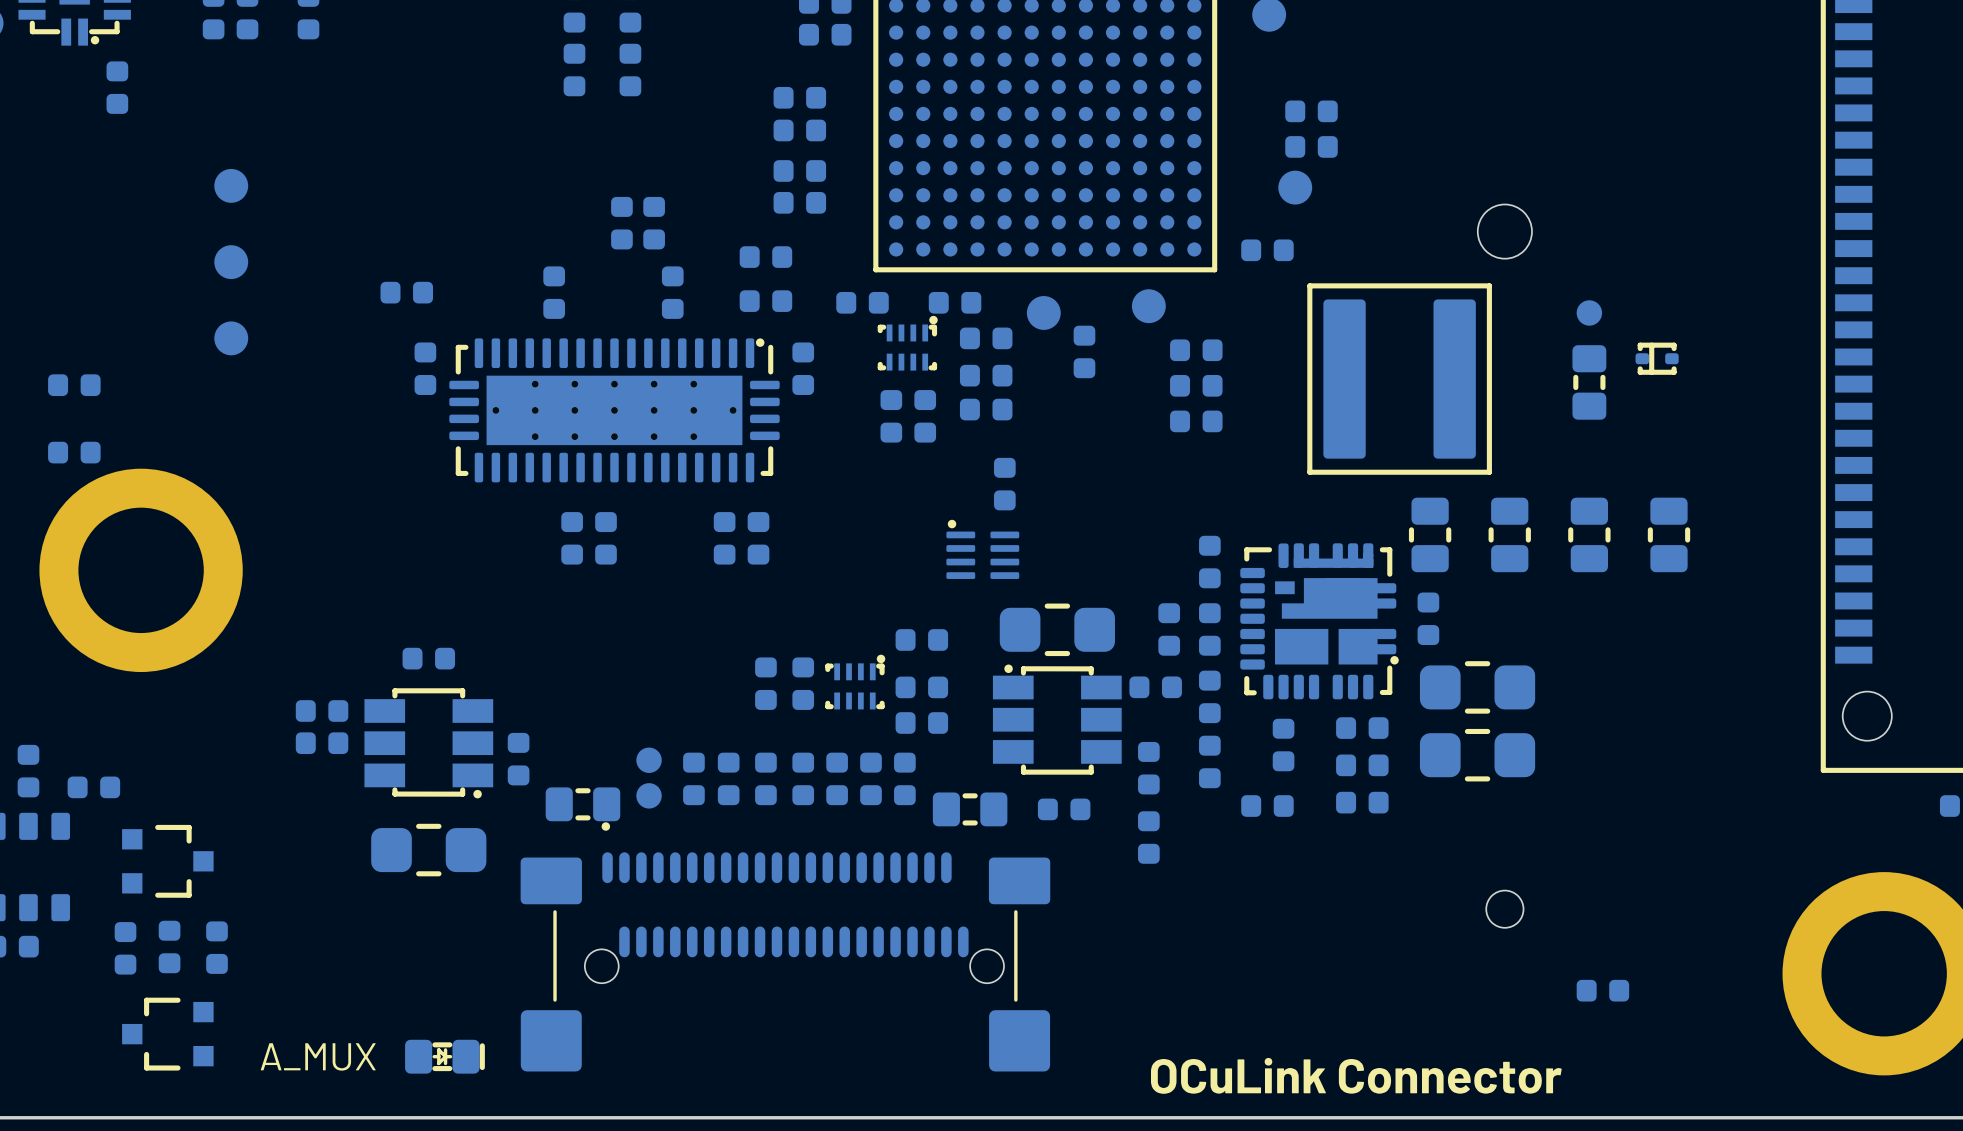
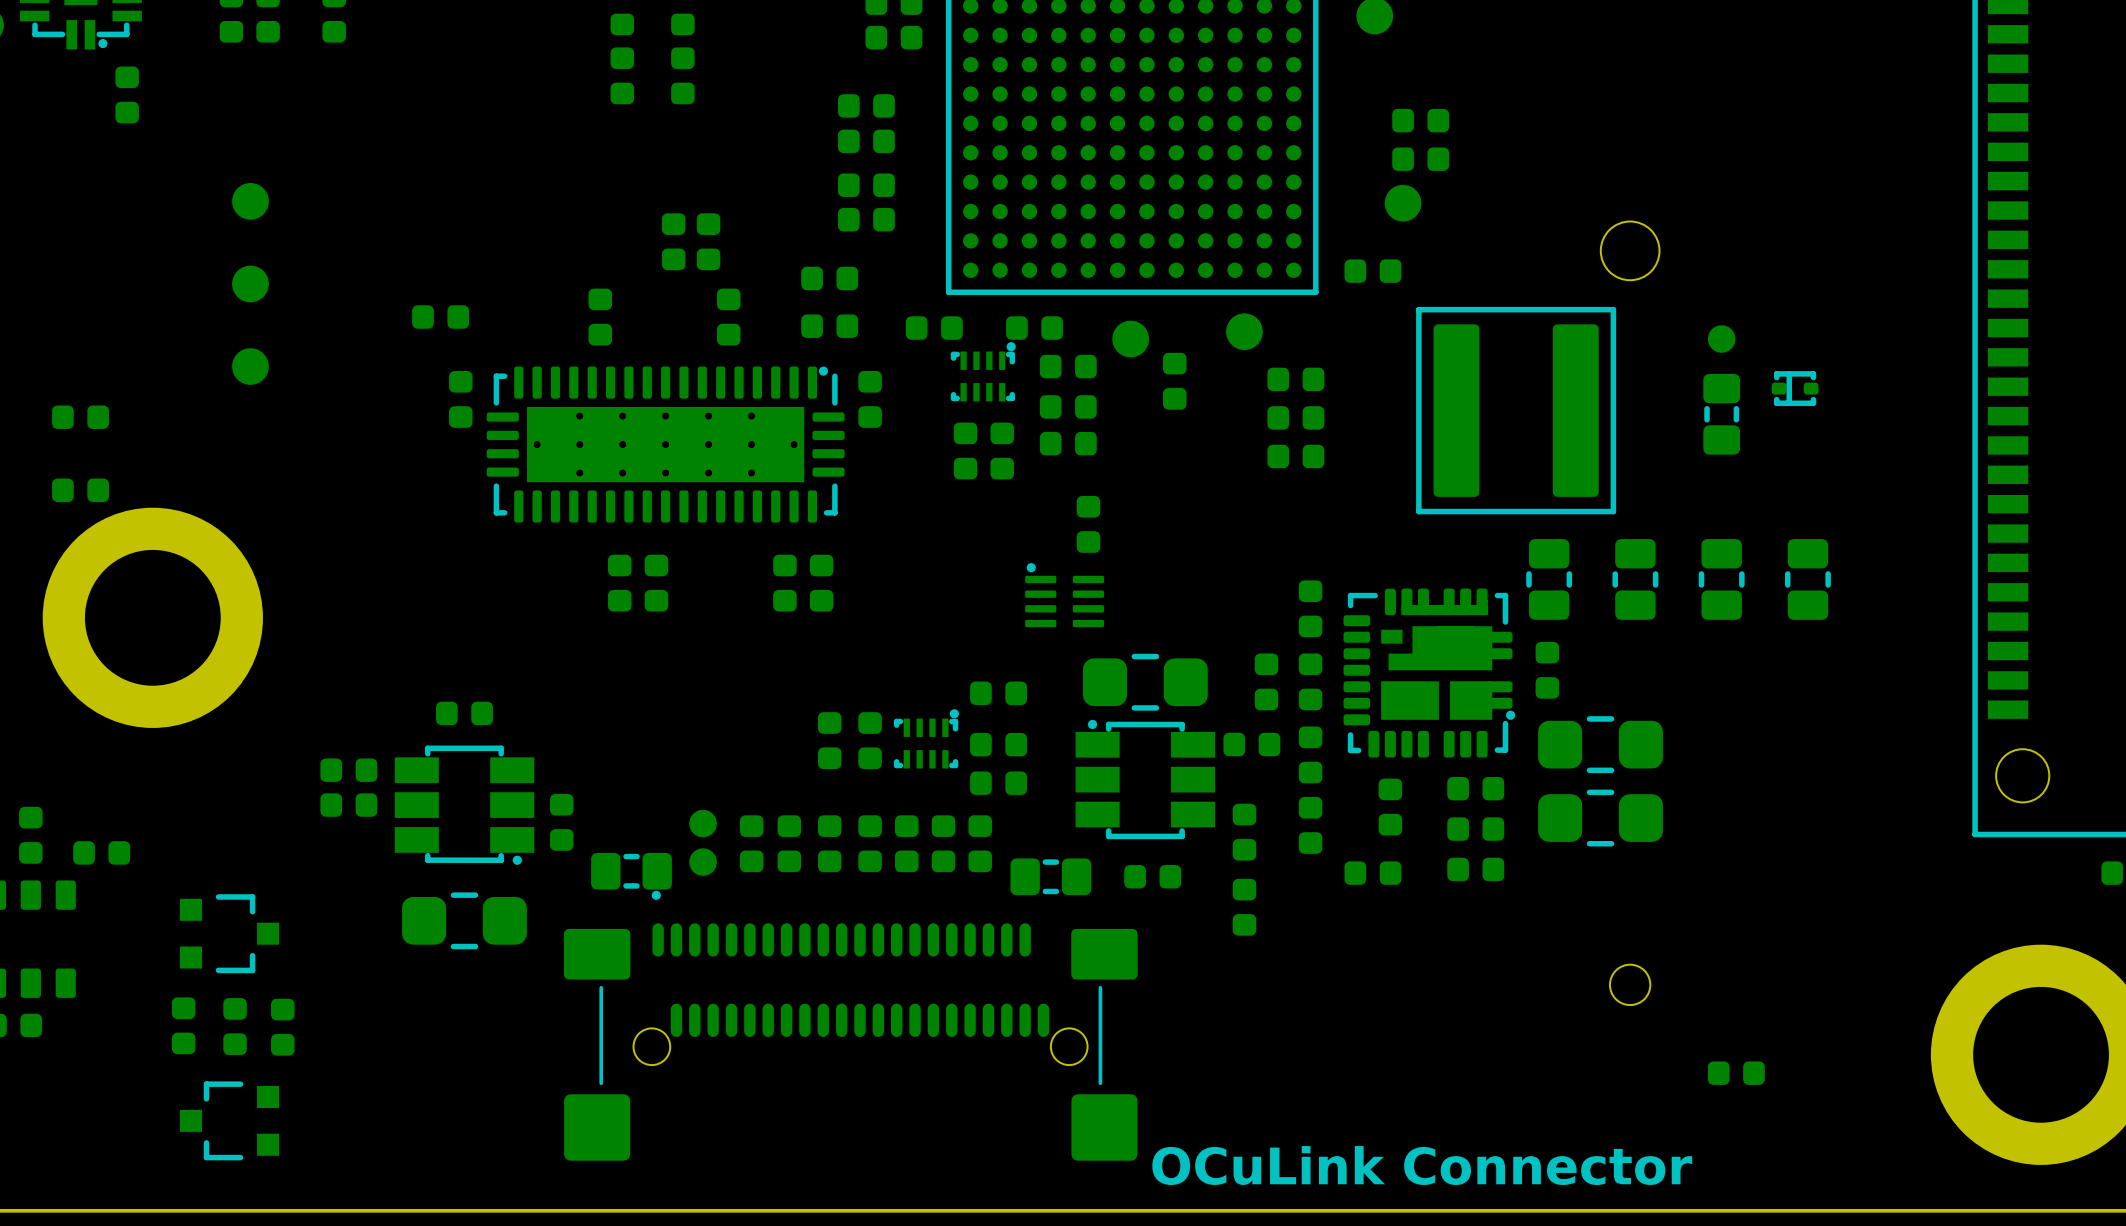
part position: (167, 861) -> (229, 933)
part position: (125, 948) -> (282, 1027)
part position: (167, 1034) -> (229, 1120)
text: A_MUX (318, 1056) -> none
part: (444, 1056) -> none

